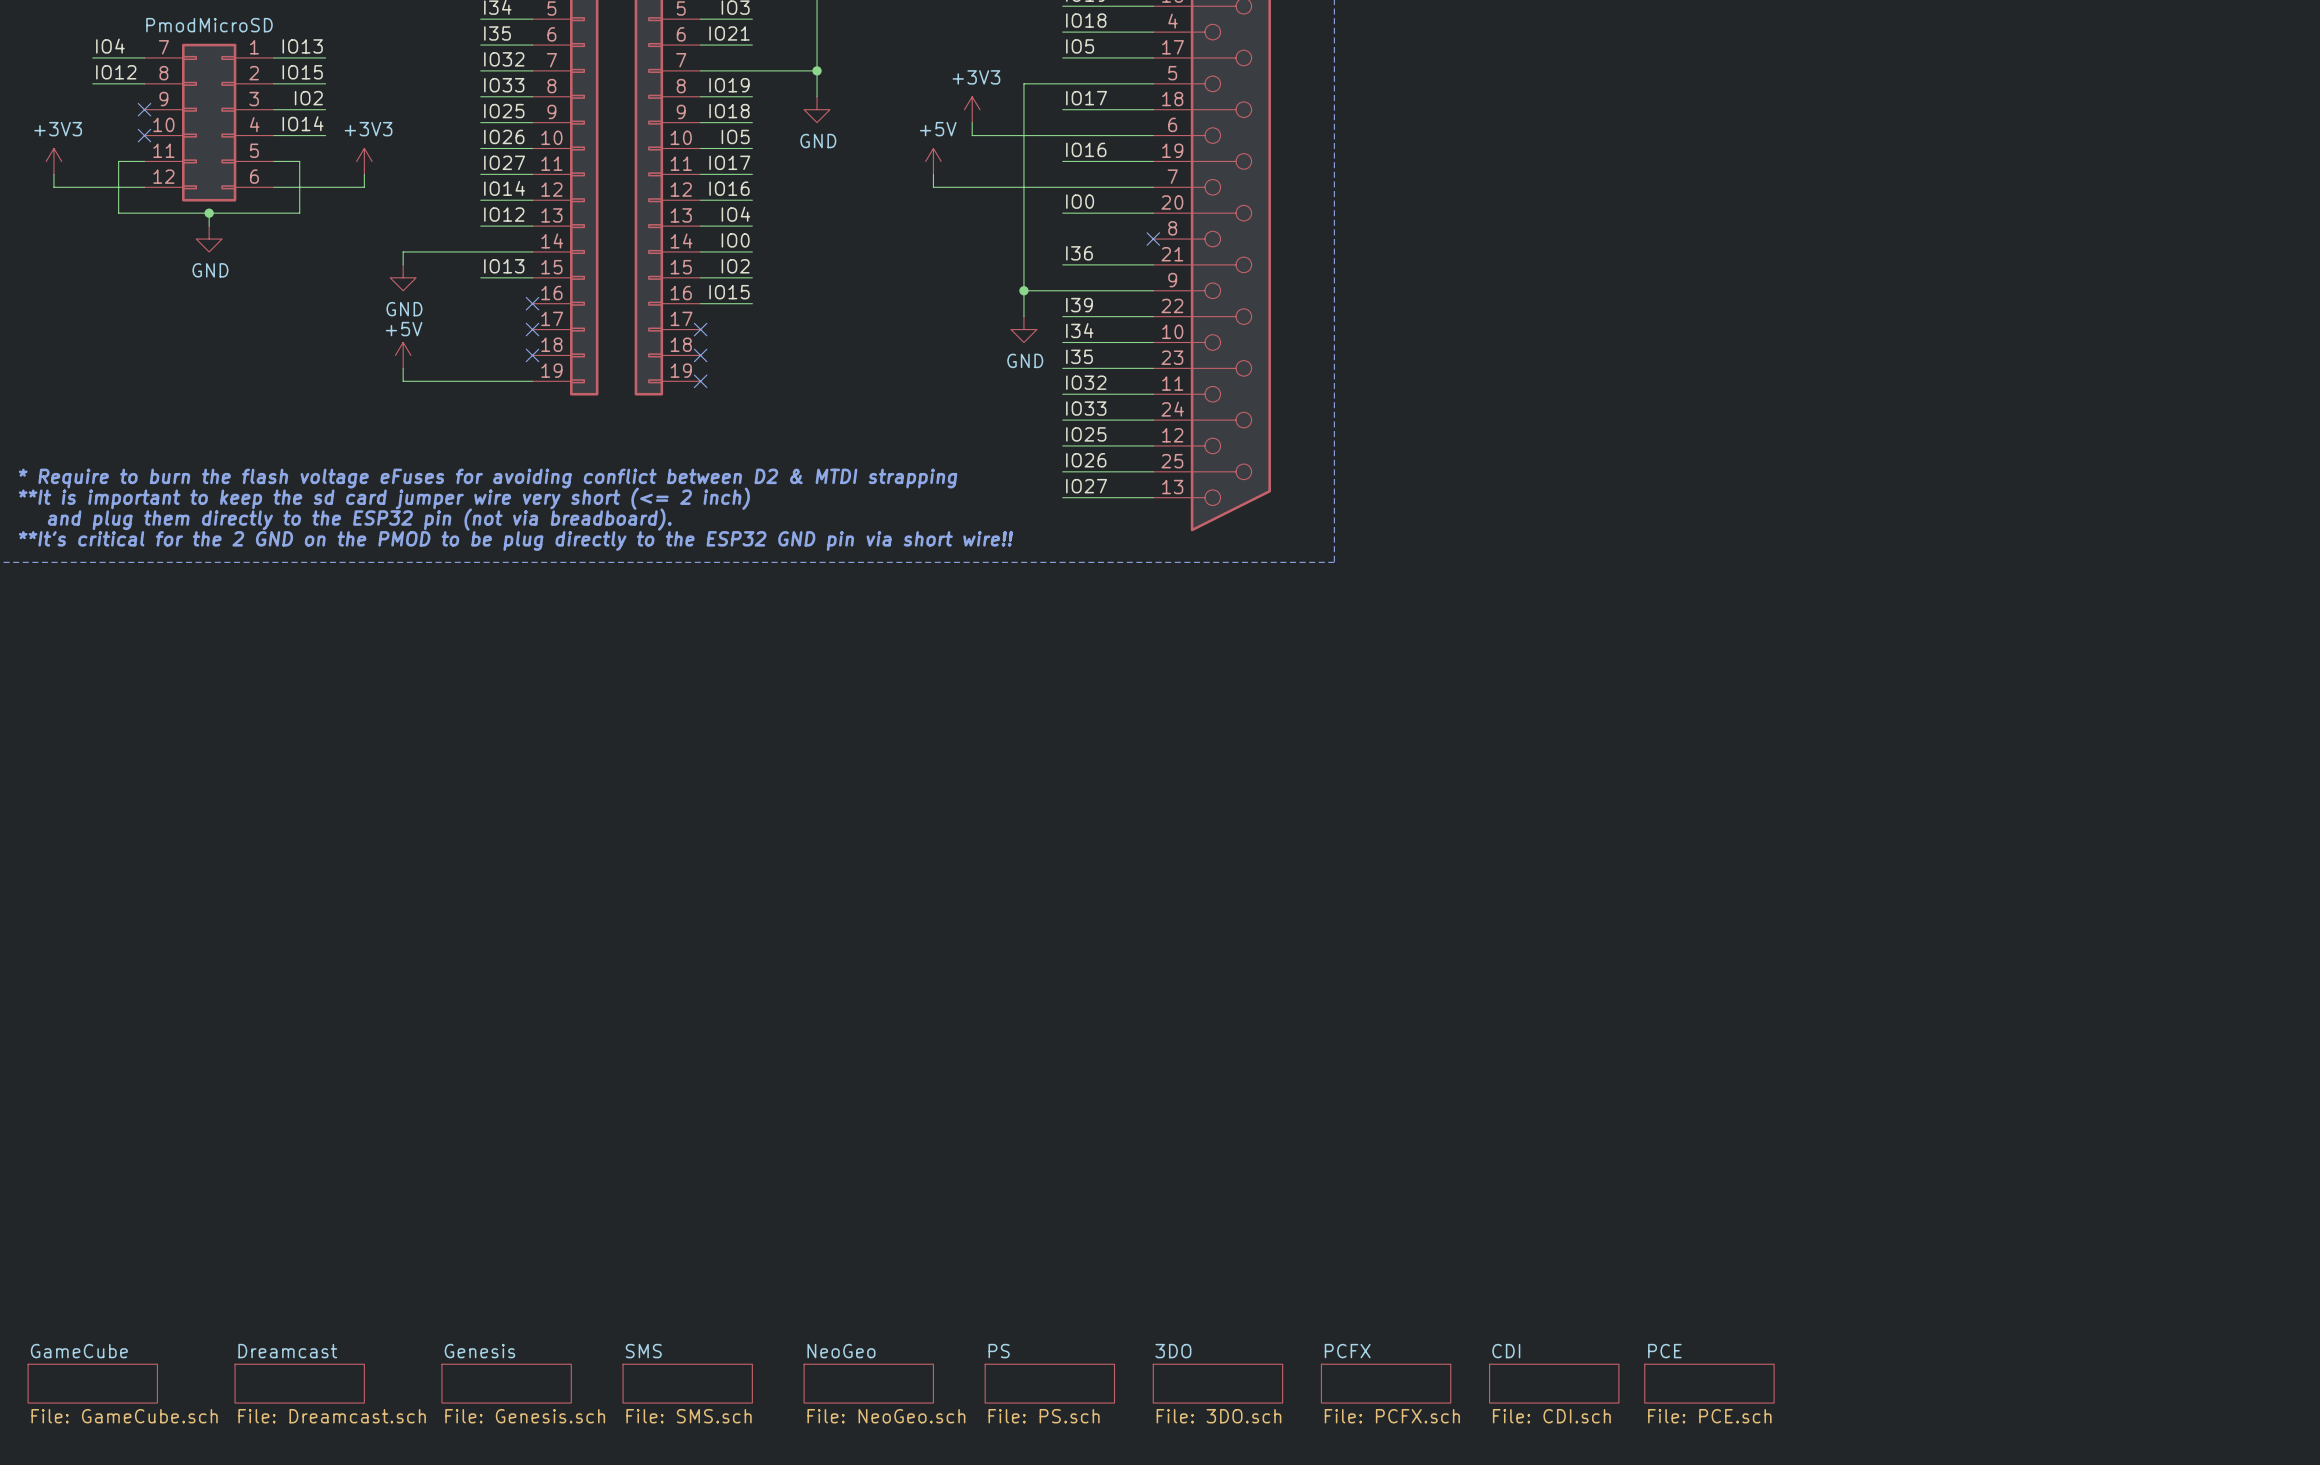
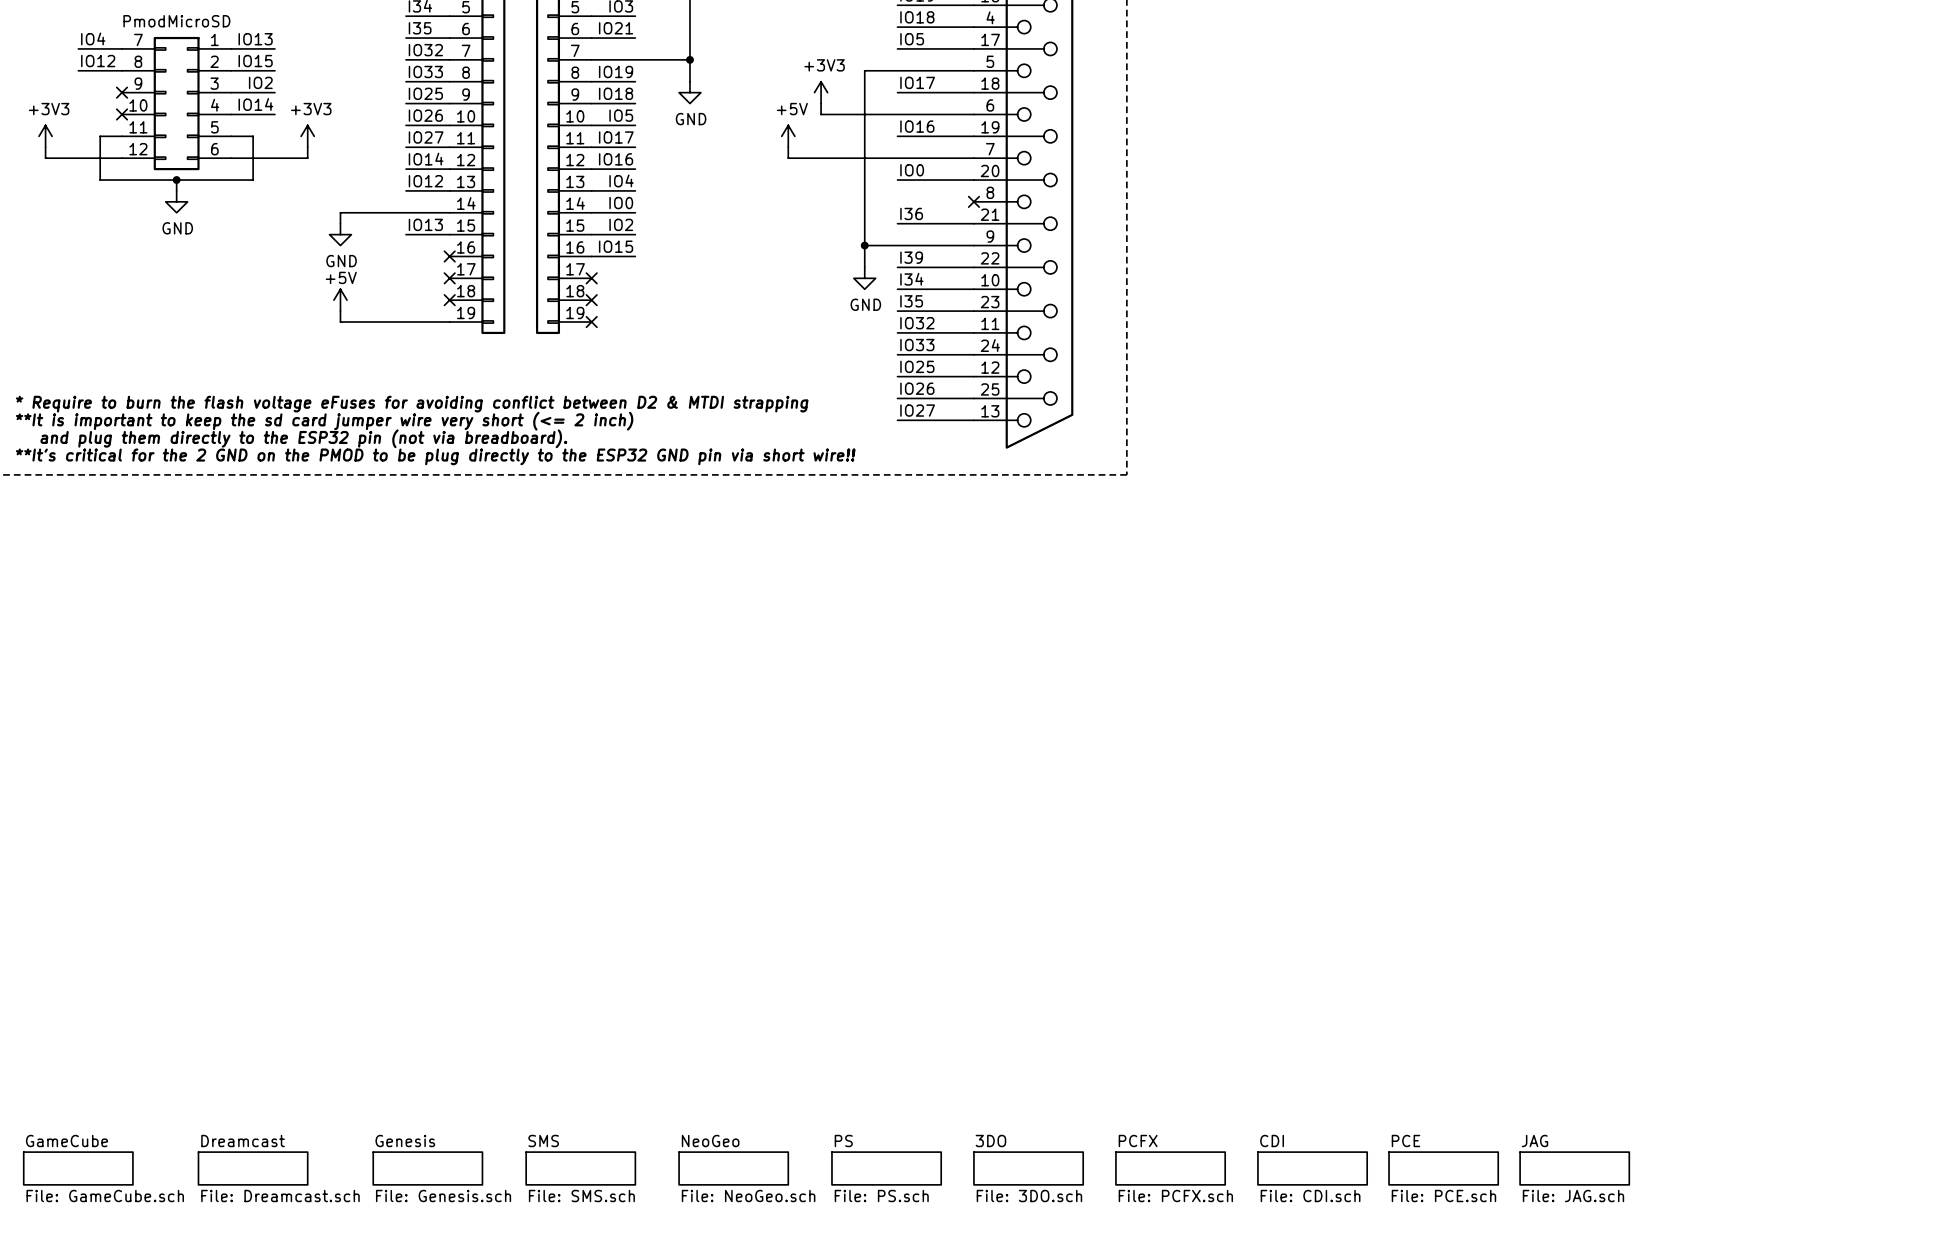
sheet JAG: none -> File: JAG.sch (1574, 1168)

